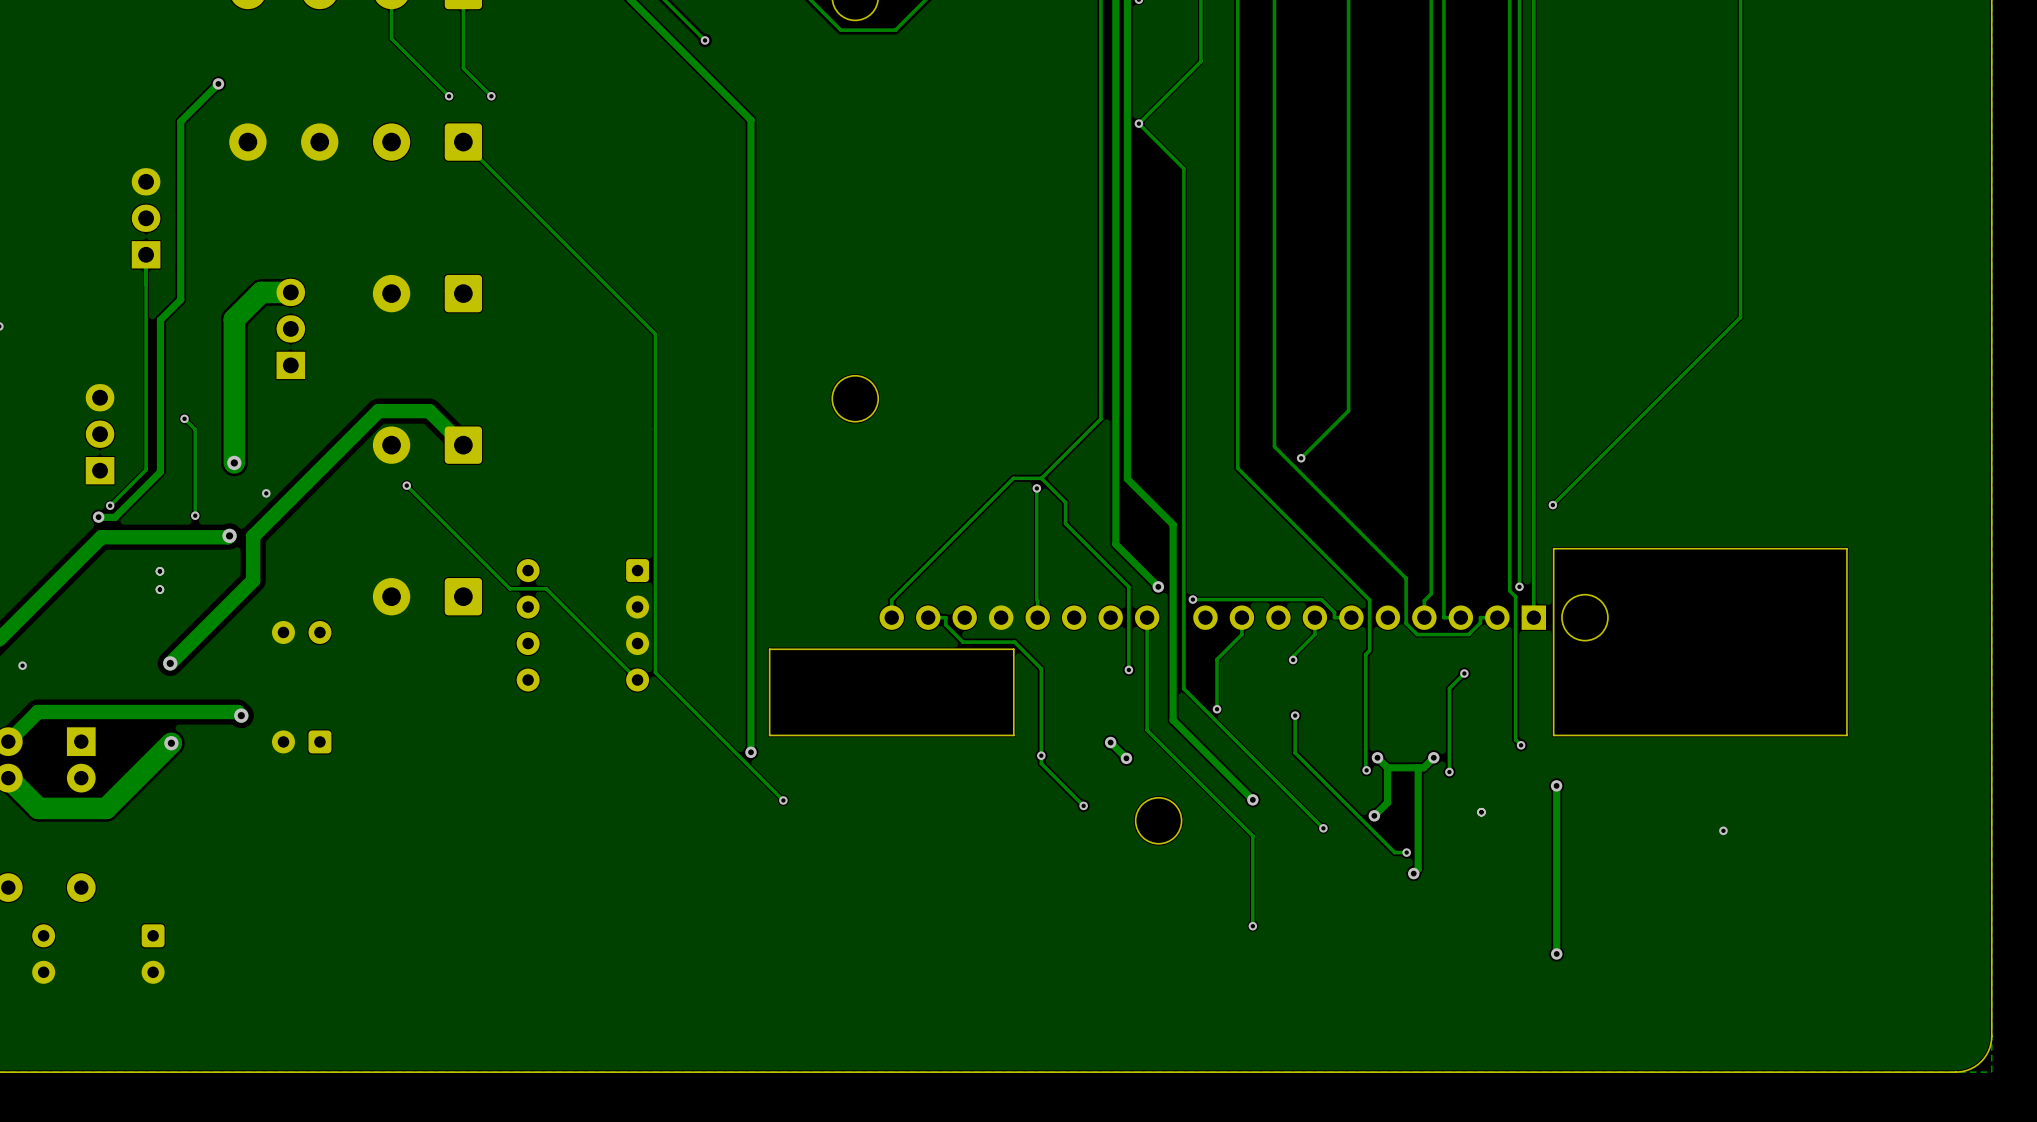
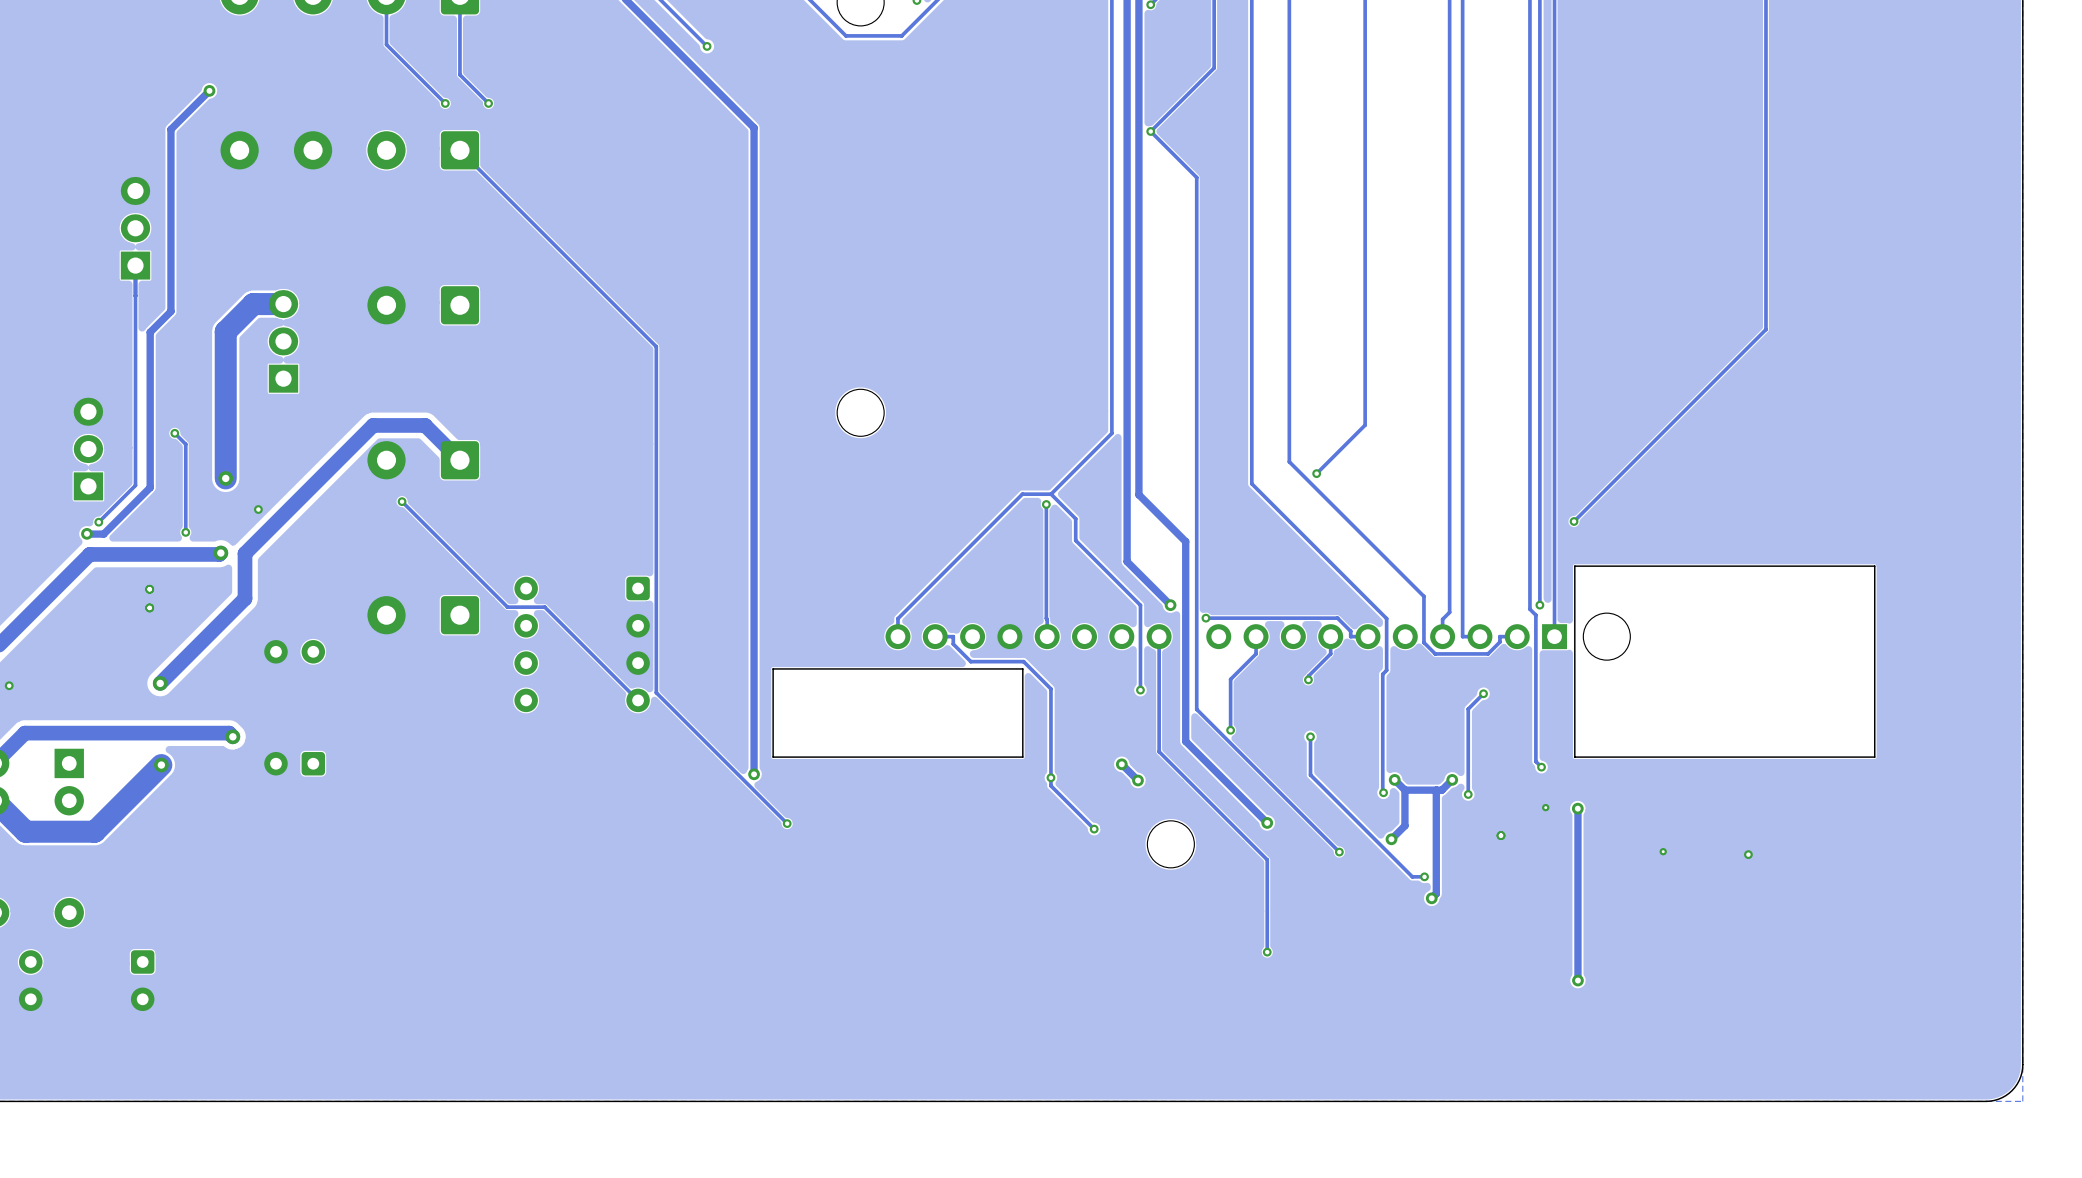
via: none -> (1545, 807)
via: none -> (1663, 851)

